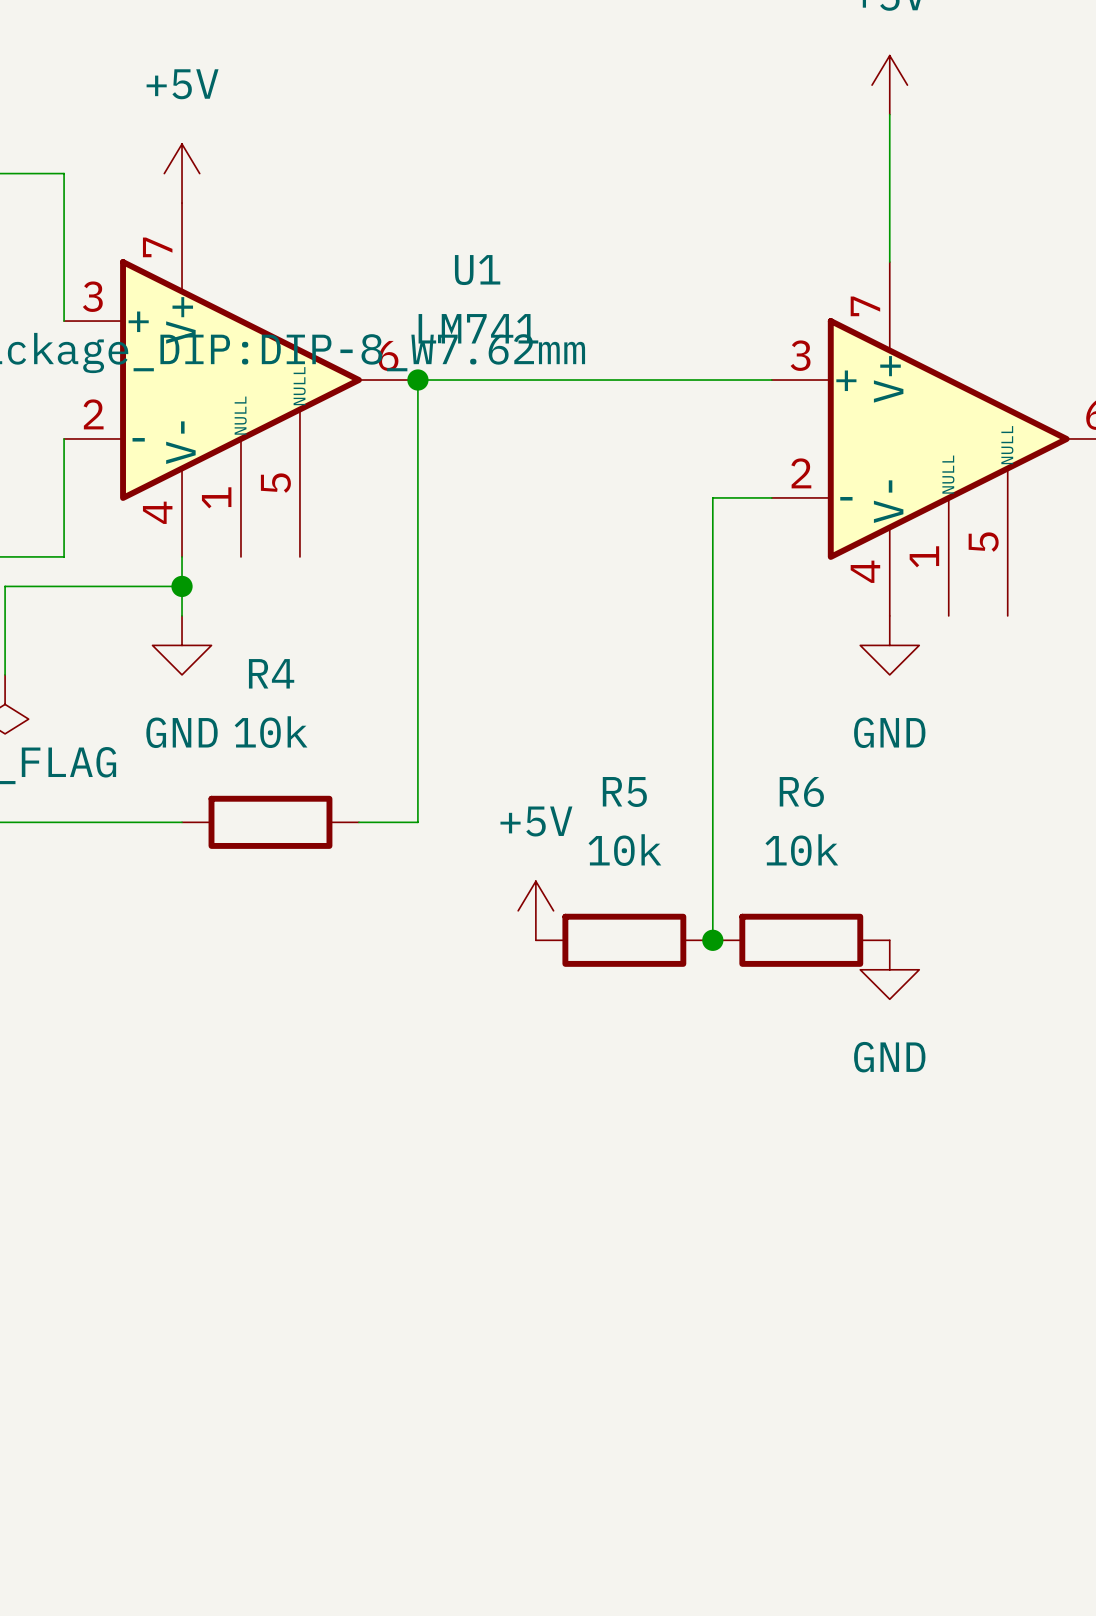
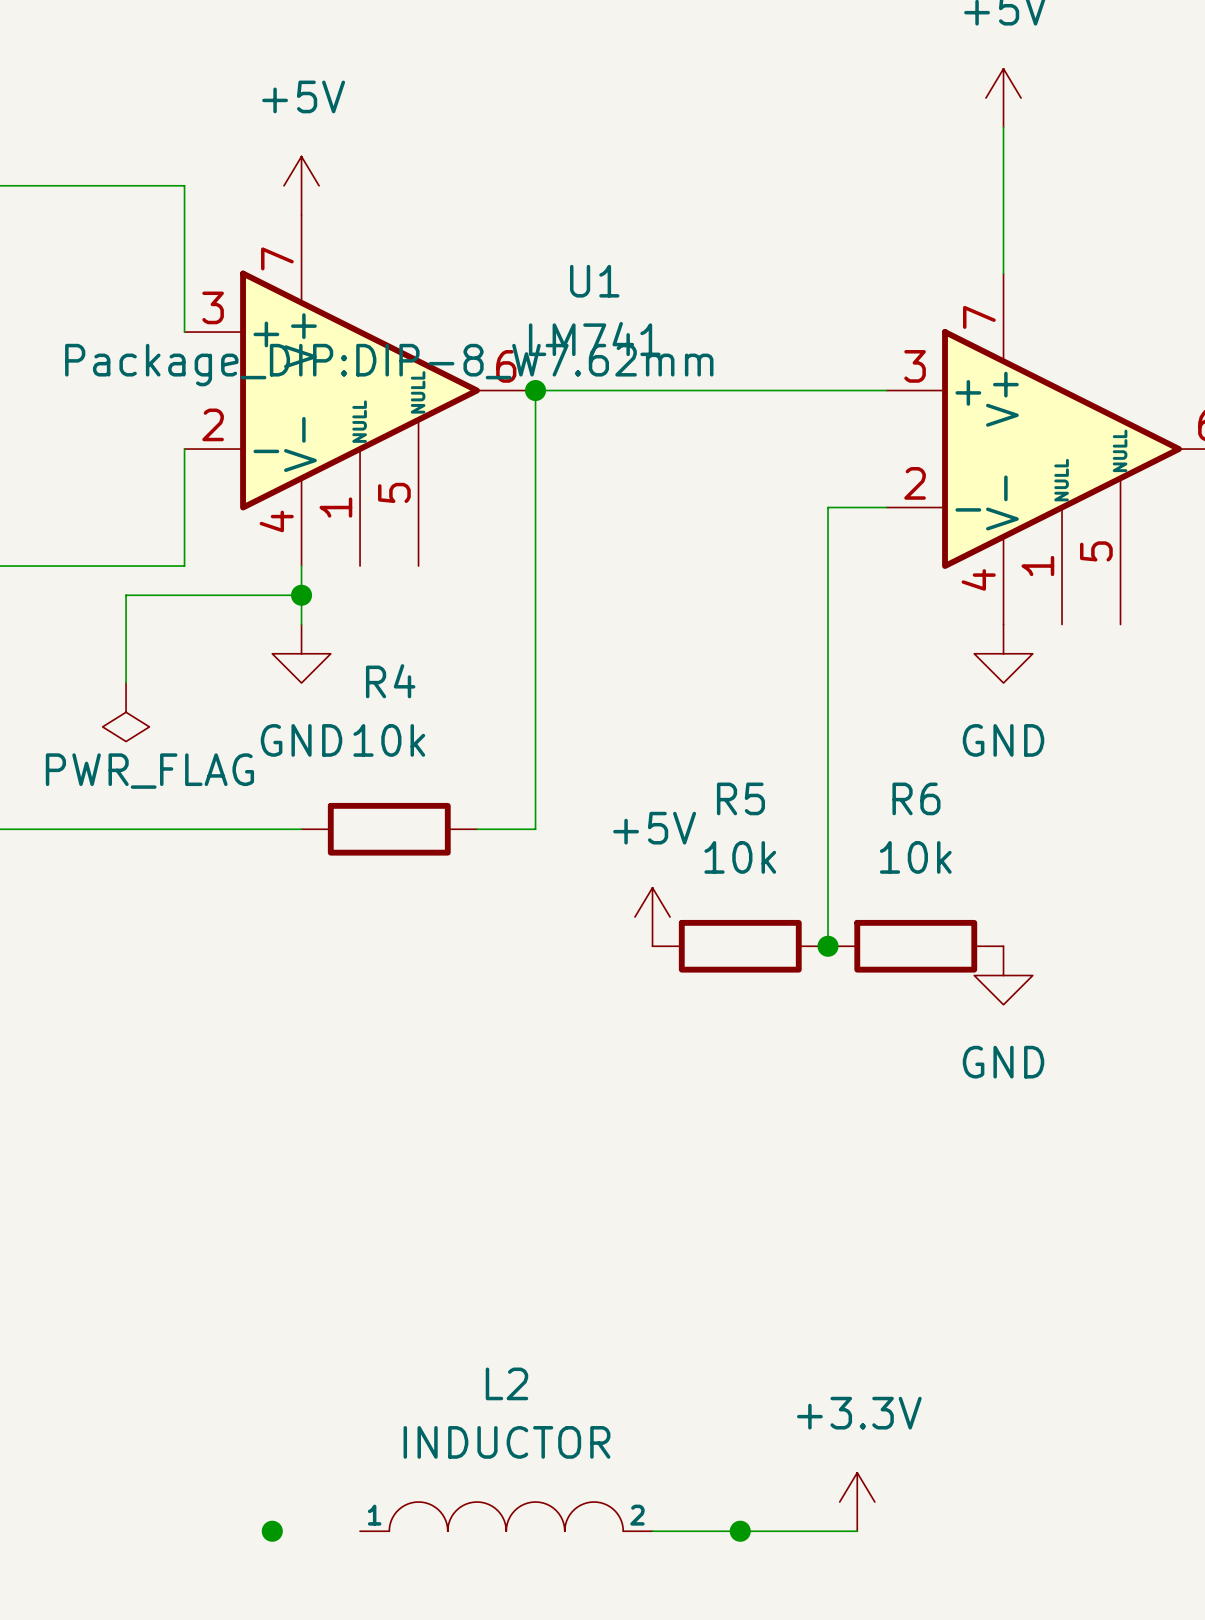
power symbol: none -> +3.3V (857, 1501)
L2: none -> INDUCTOR (506, 1516)
junction: none -> (272, 1531)
wire: none -> (652, 1531) (857, 1531)
junction: none -> (740, 1531)

